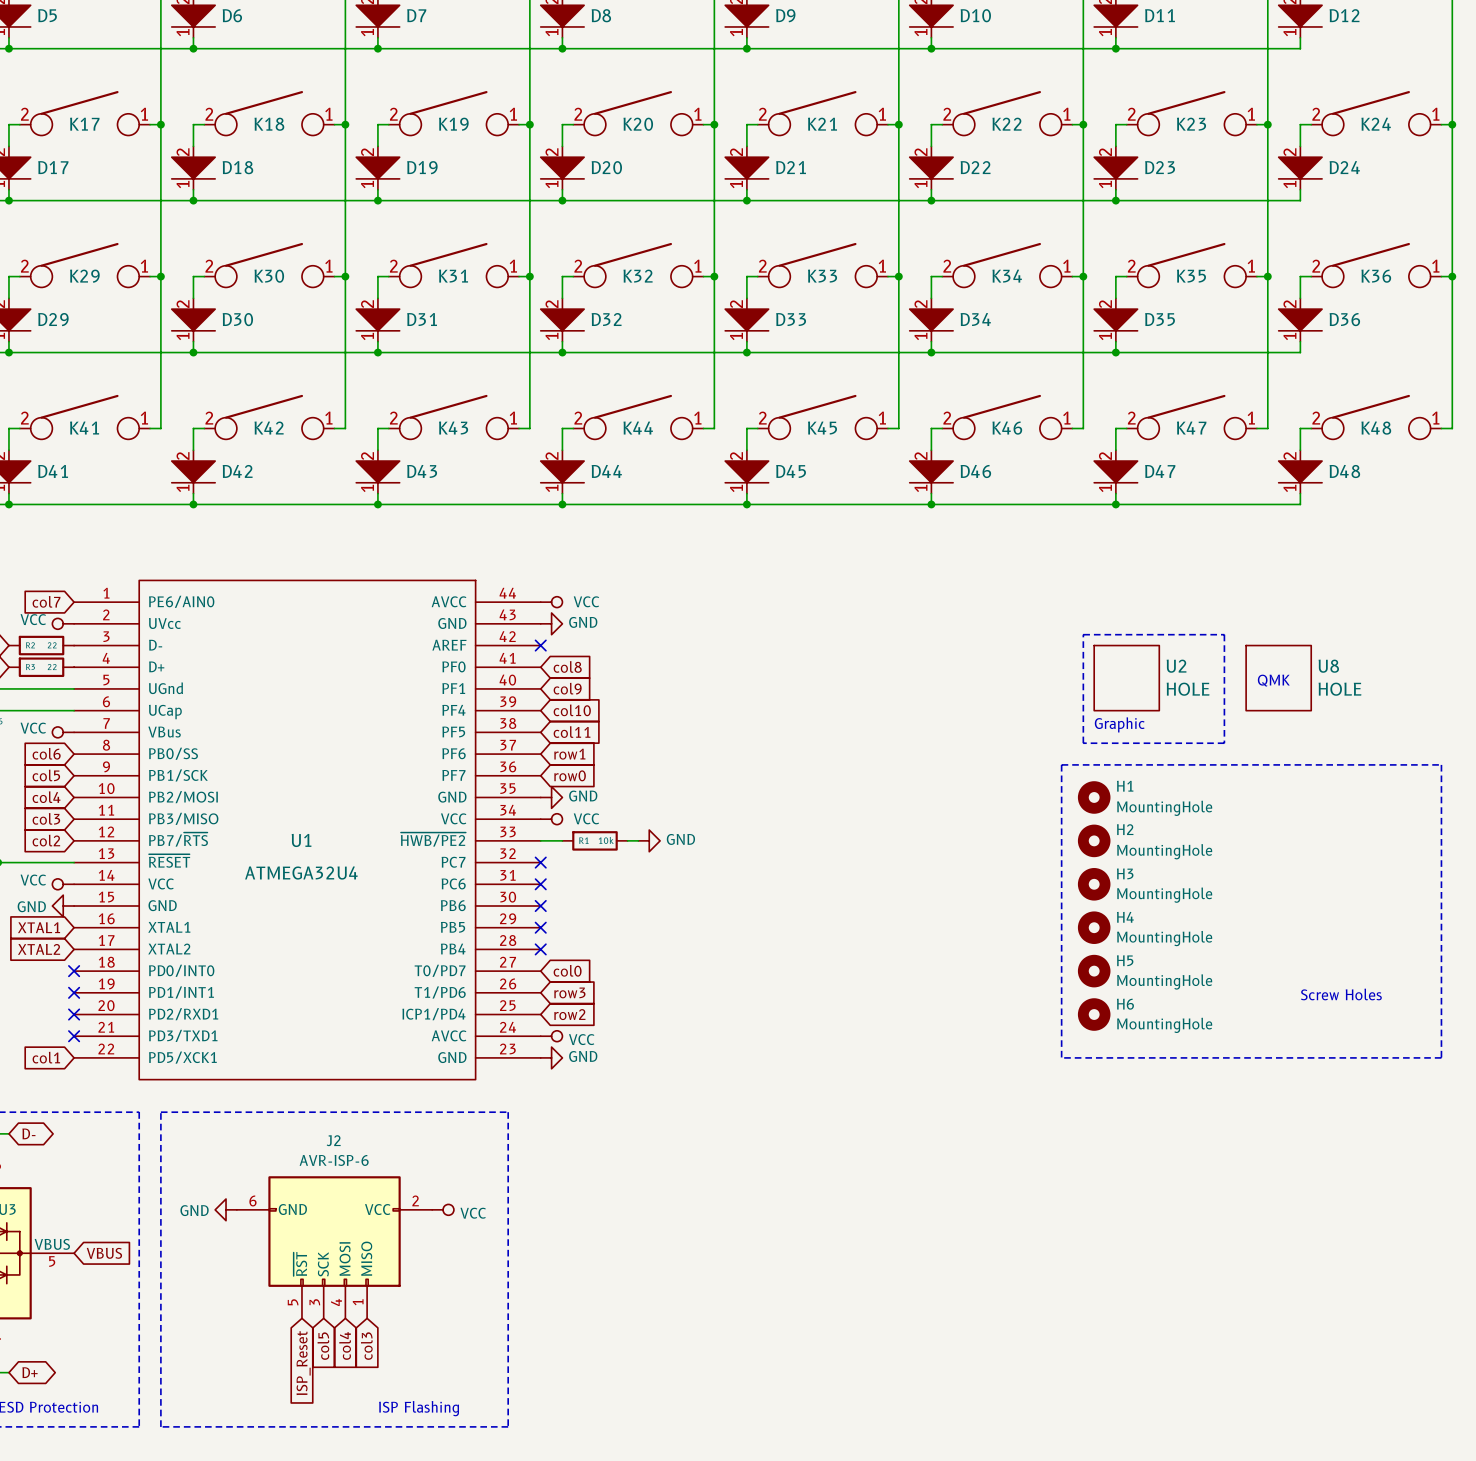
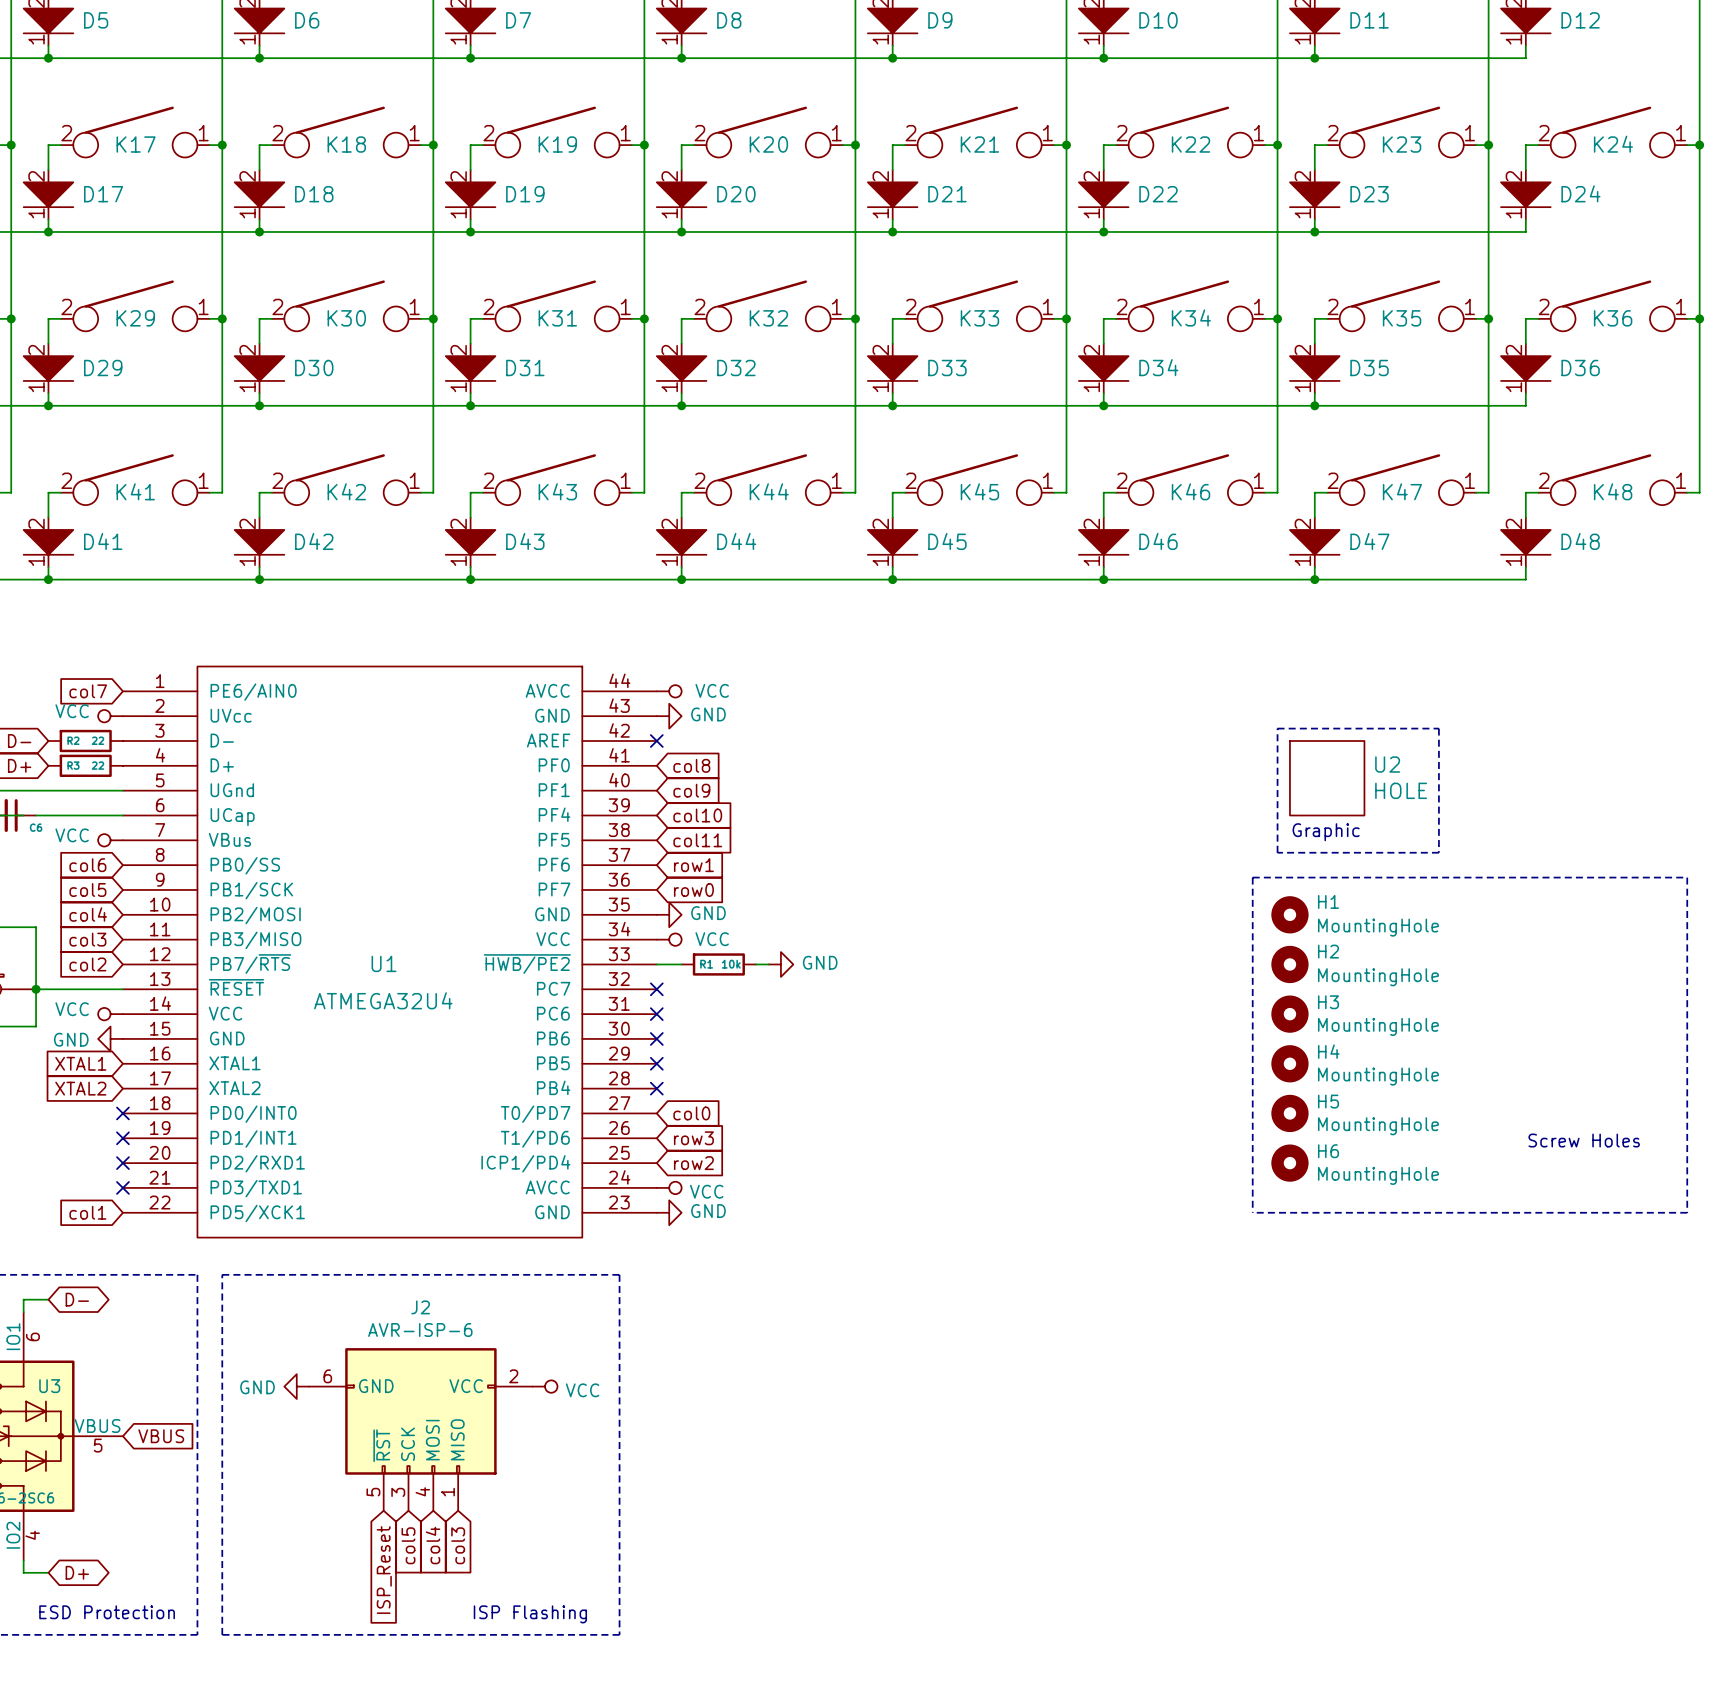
U8: HOLE (1278, 678) -> none
text: QMK (1273, 680) -> none

